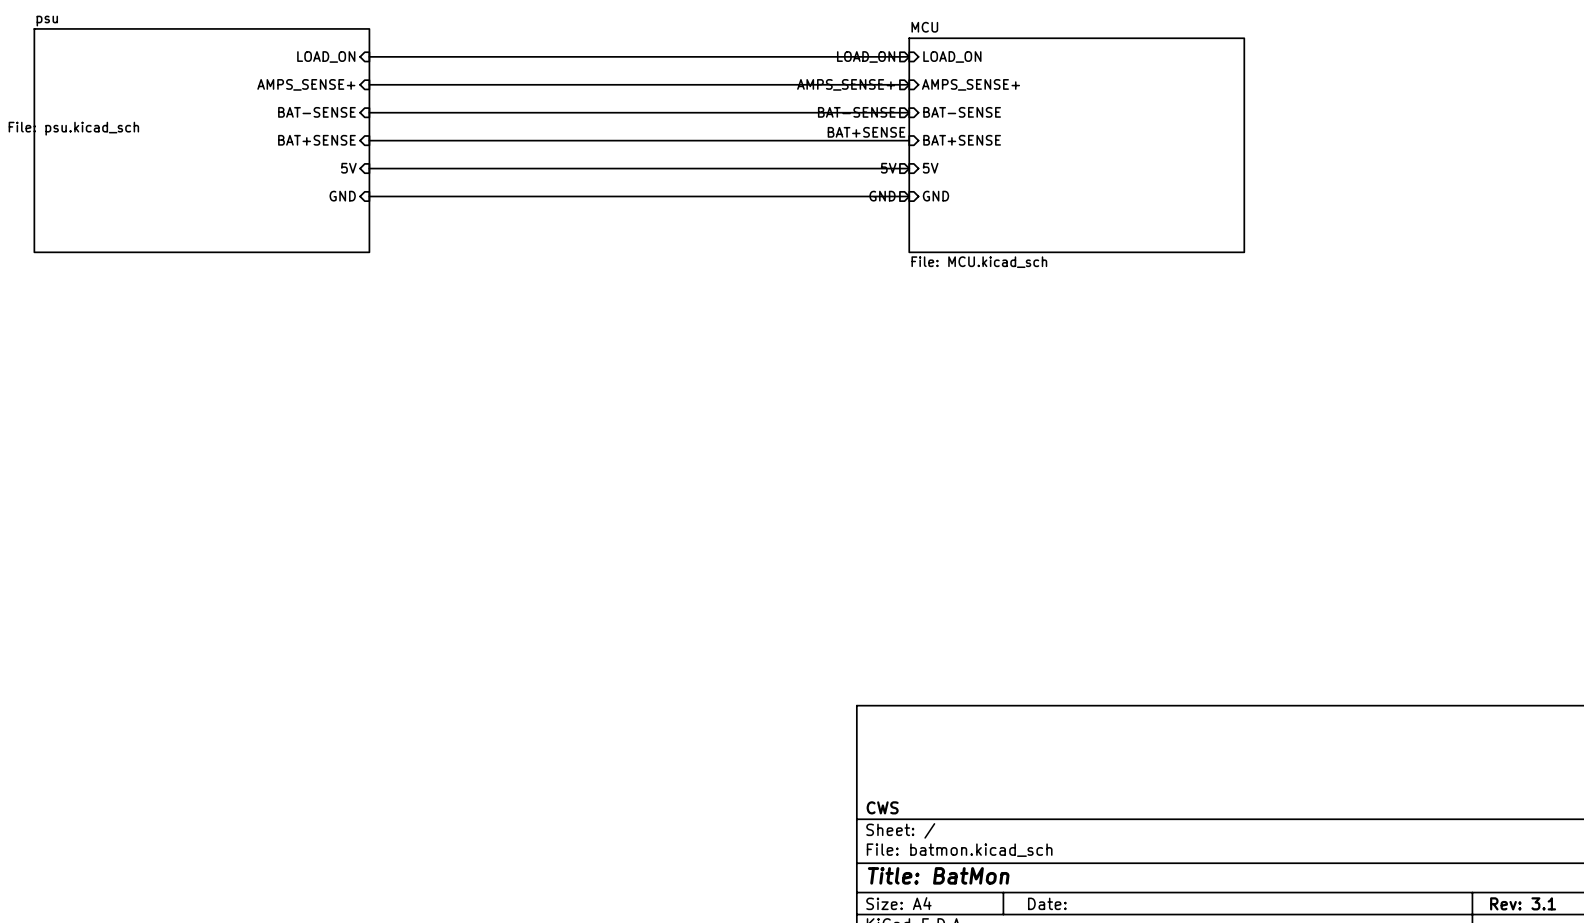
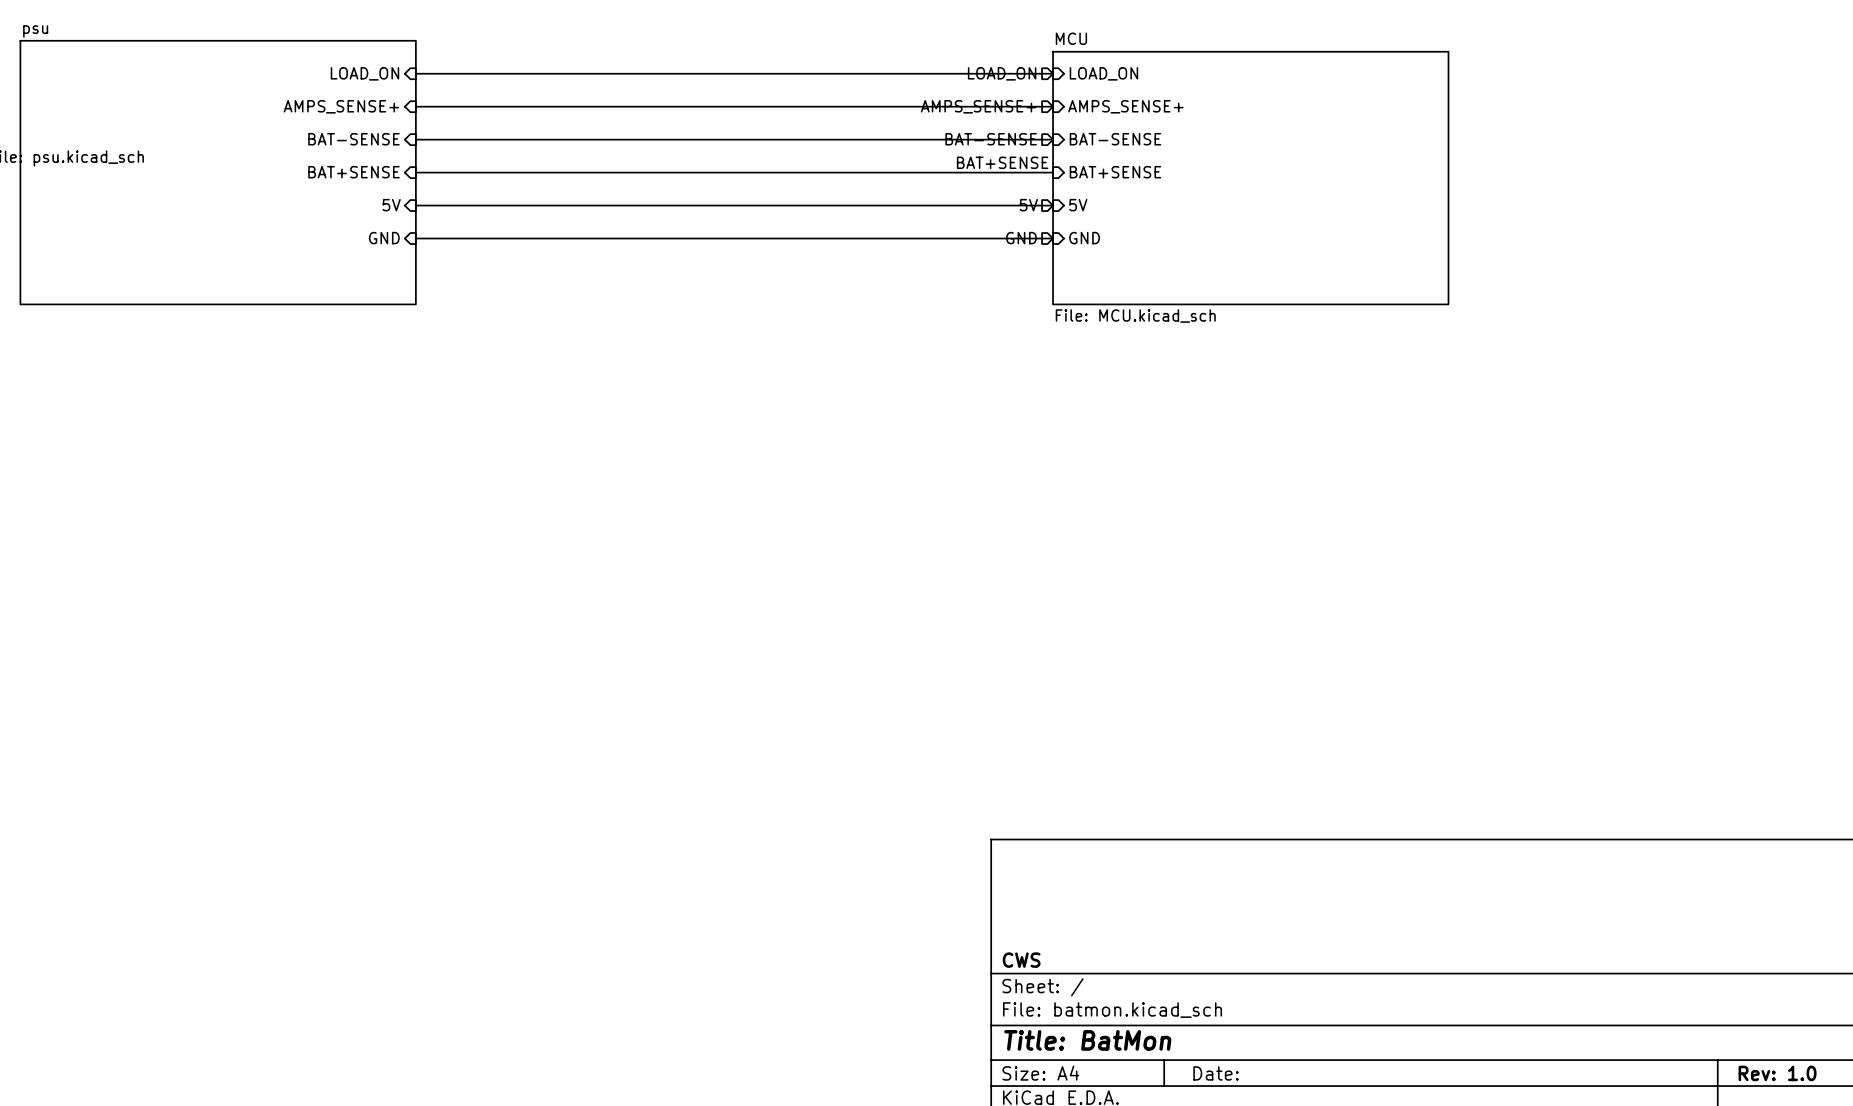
title block: Rev: 3.1 (1523, 903) -> Rev: 1.0 (1777, 1073)

